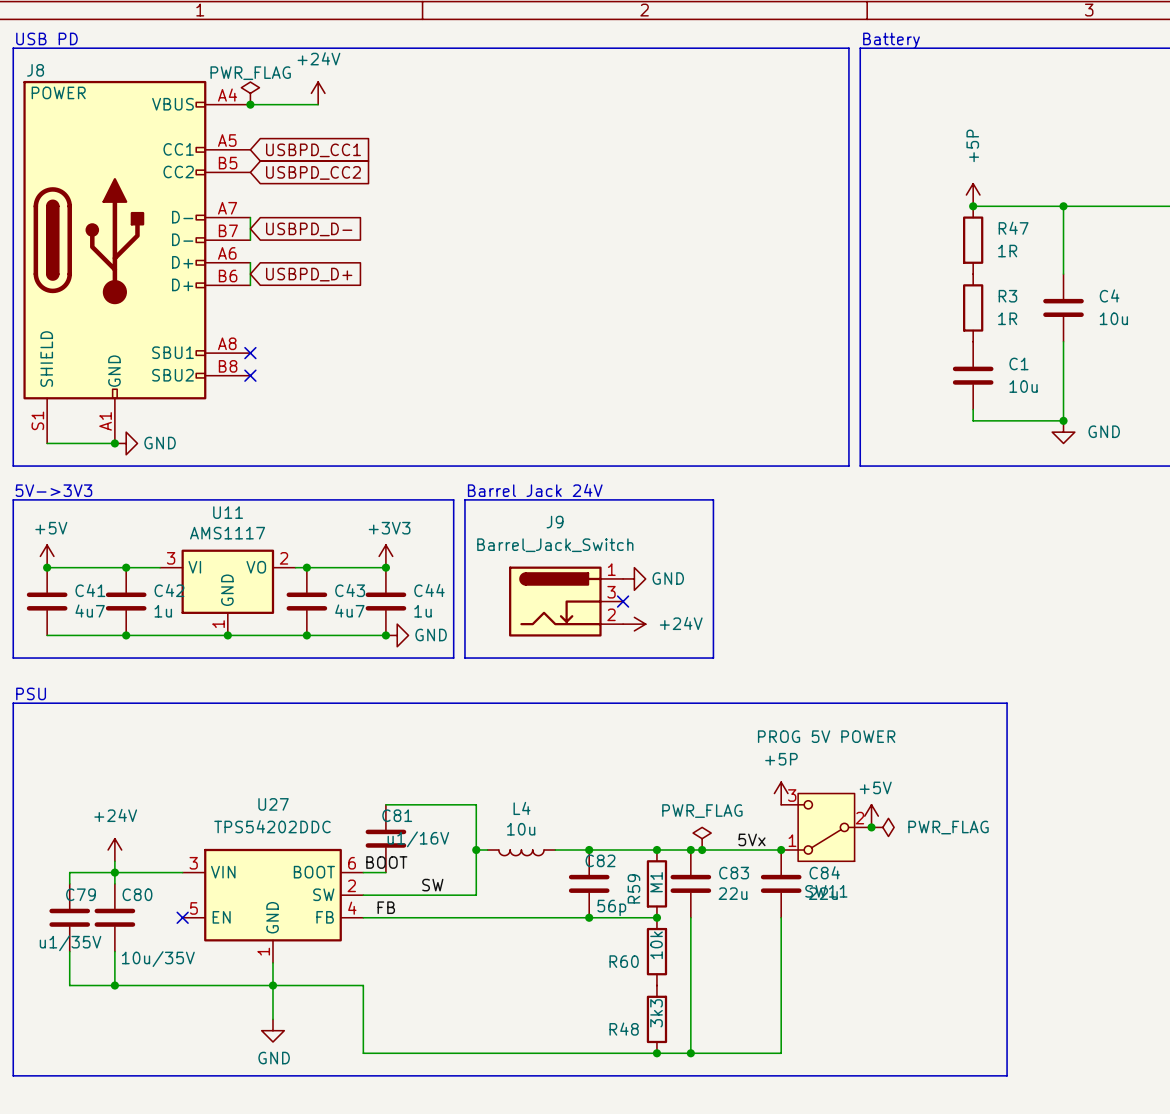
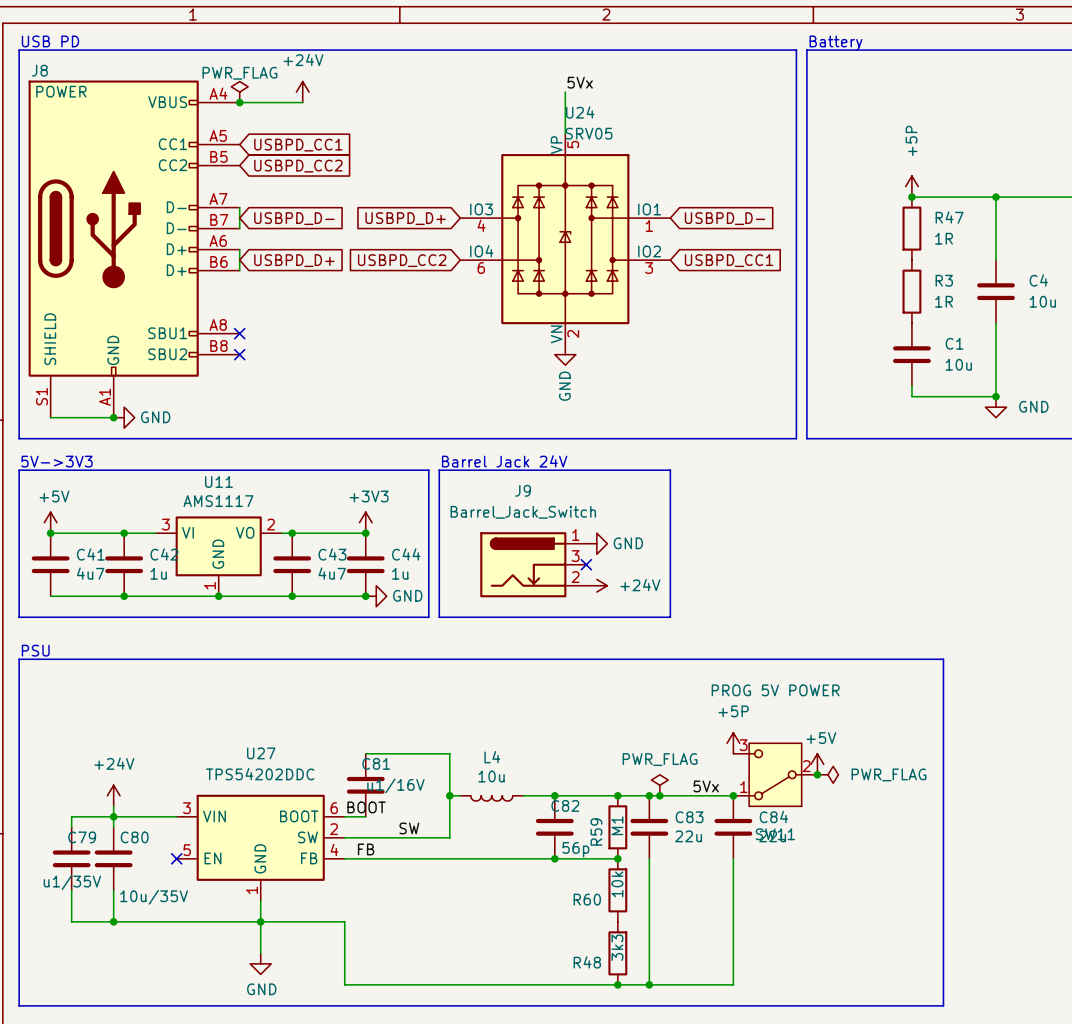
label: none -> 5Vx (580, 82)
wire: none -> (565, 92) (565, 134)
global label: none -> USBPD_D+ (405, 218)
global label: none -> USBPD_D- (725, 218)
U24: none -> SRV05 (565, 239)
global label: none -> USBPD_CC2 (402, 260)
global label: none -> USBPD_CC1 (729, 260)
power symbol: none -> GND (565, 354)

